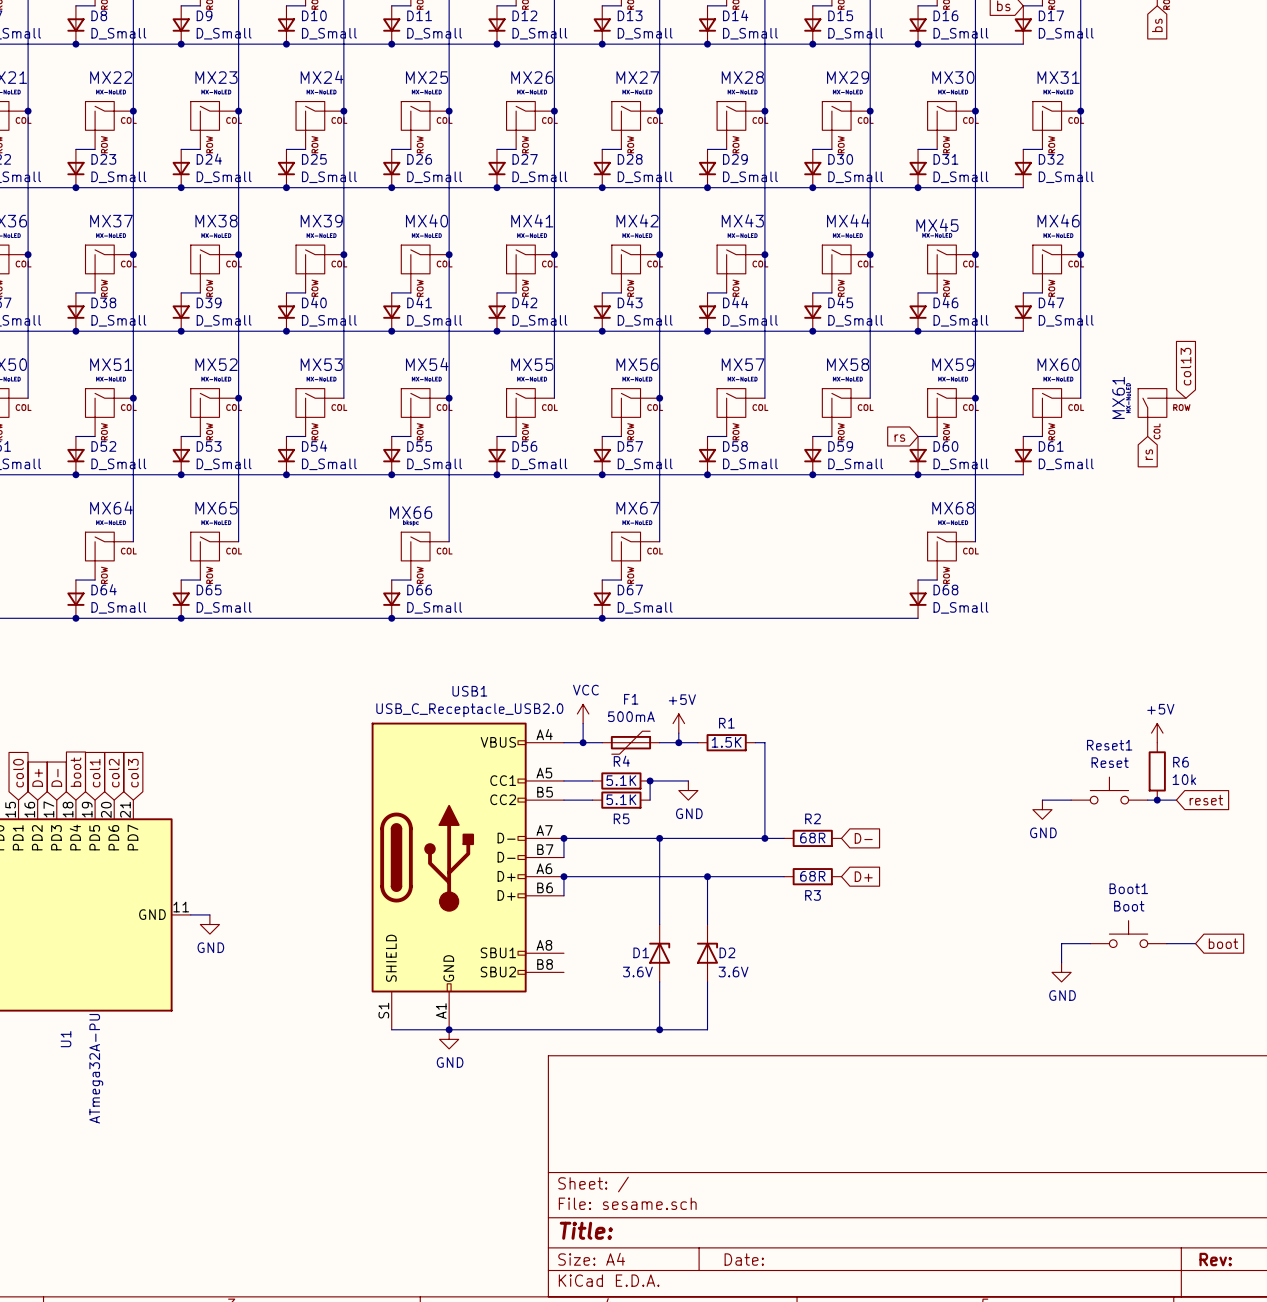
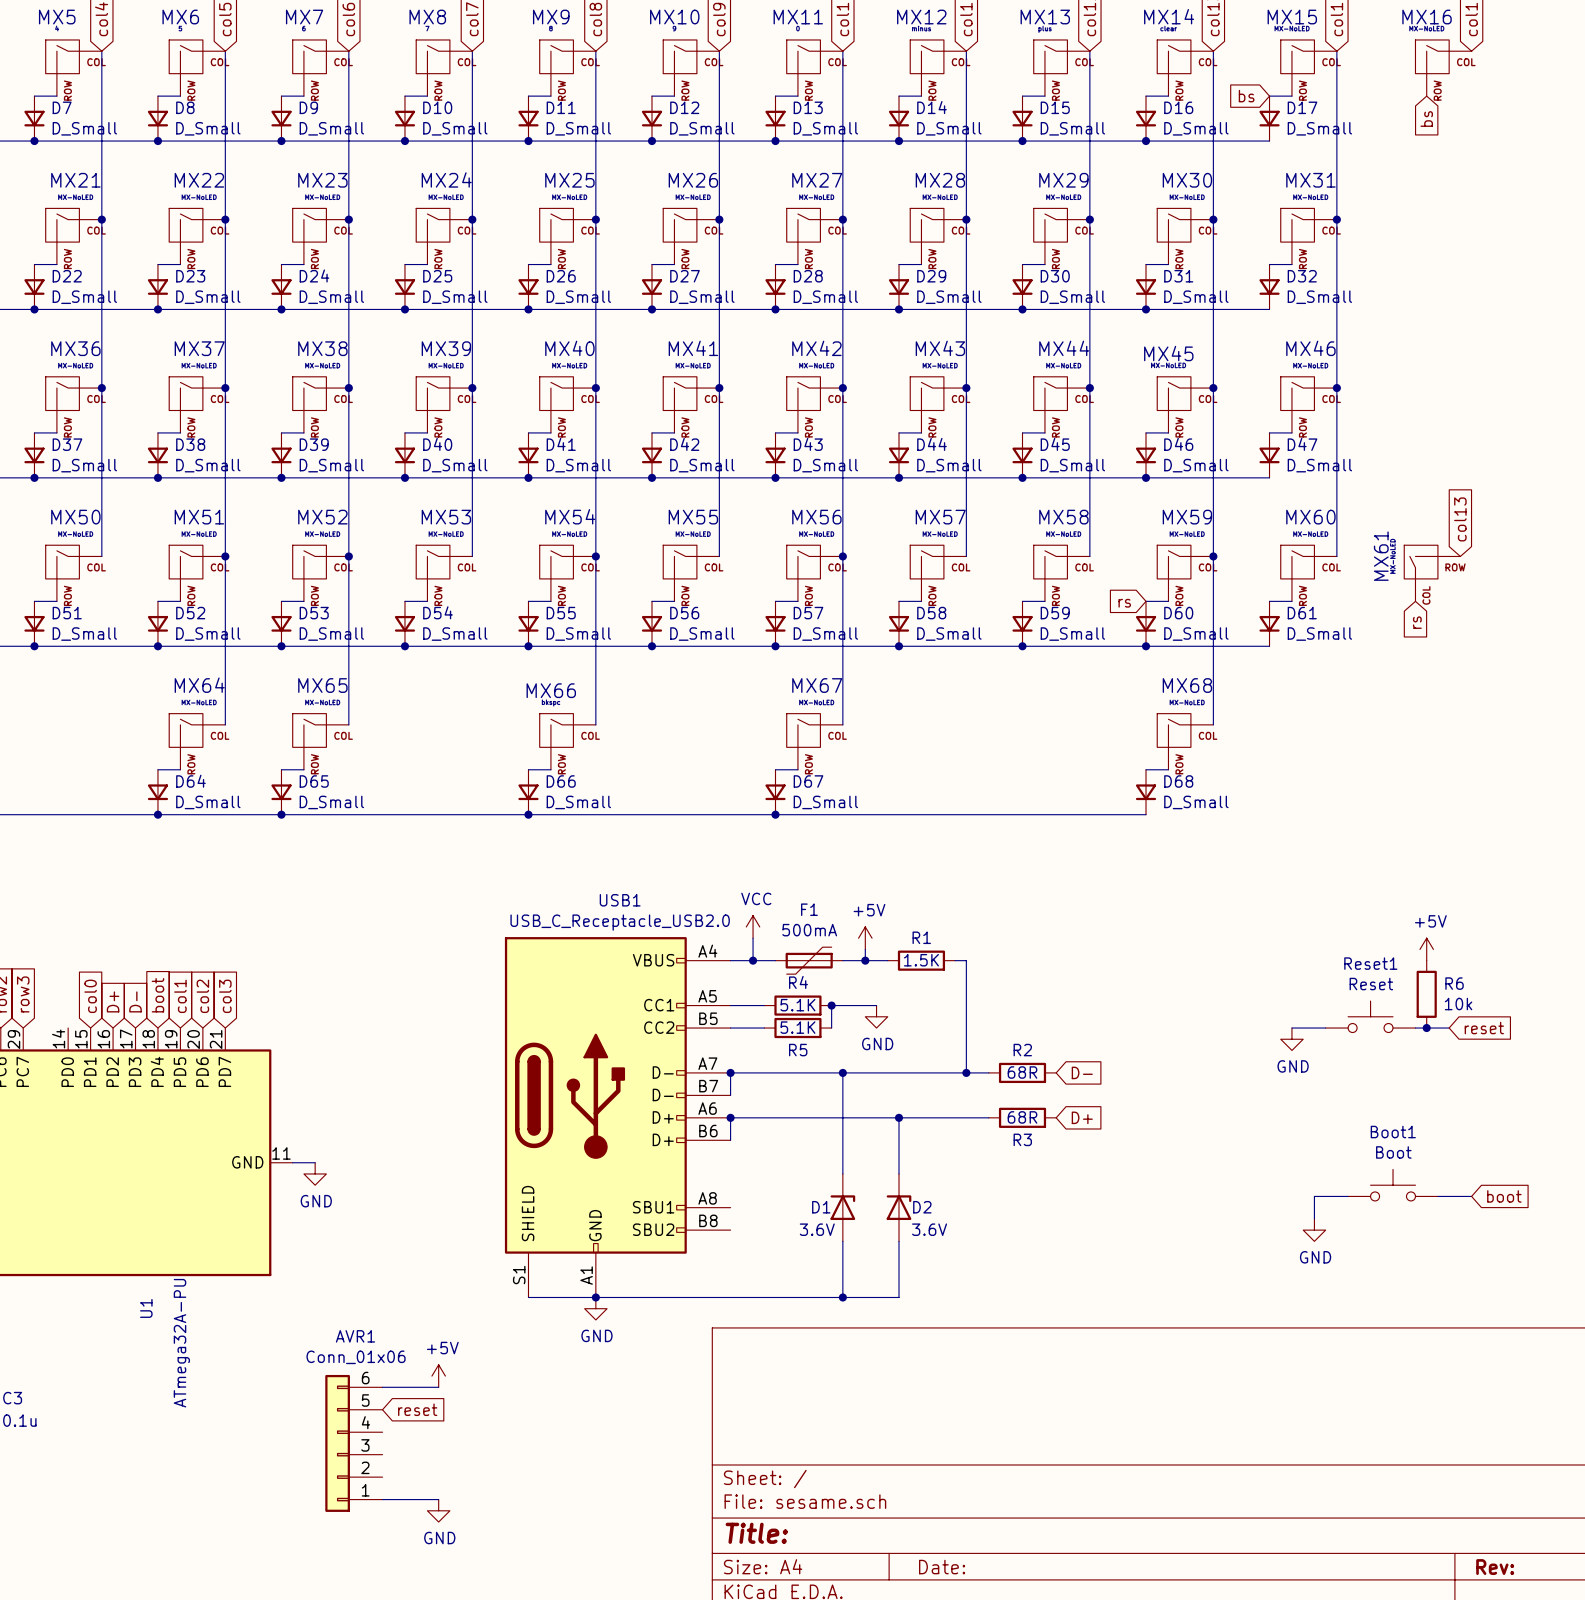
power symbol: none -> +5V (438, 1376)
wire: none -> (382, 1387) (438, 1387)
global label: none -> reset (417, 1409)
AVR1: none -> Conn_01x06 (353, 1443)
wire: none -> (382, 1499) (438, 1499)
power symbol: none -> GND (438, 1510)

